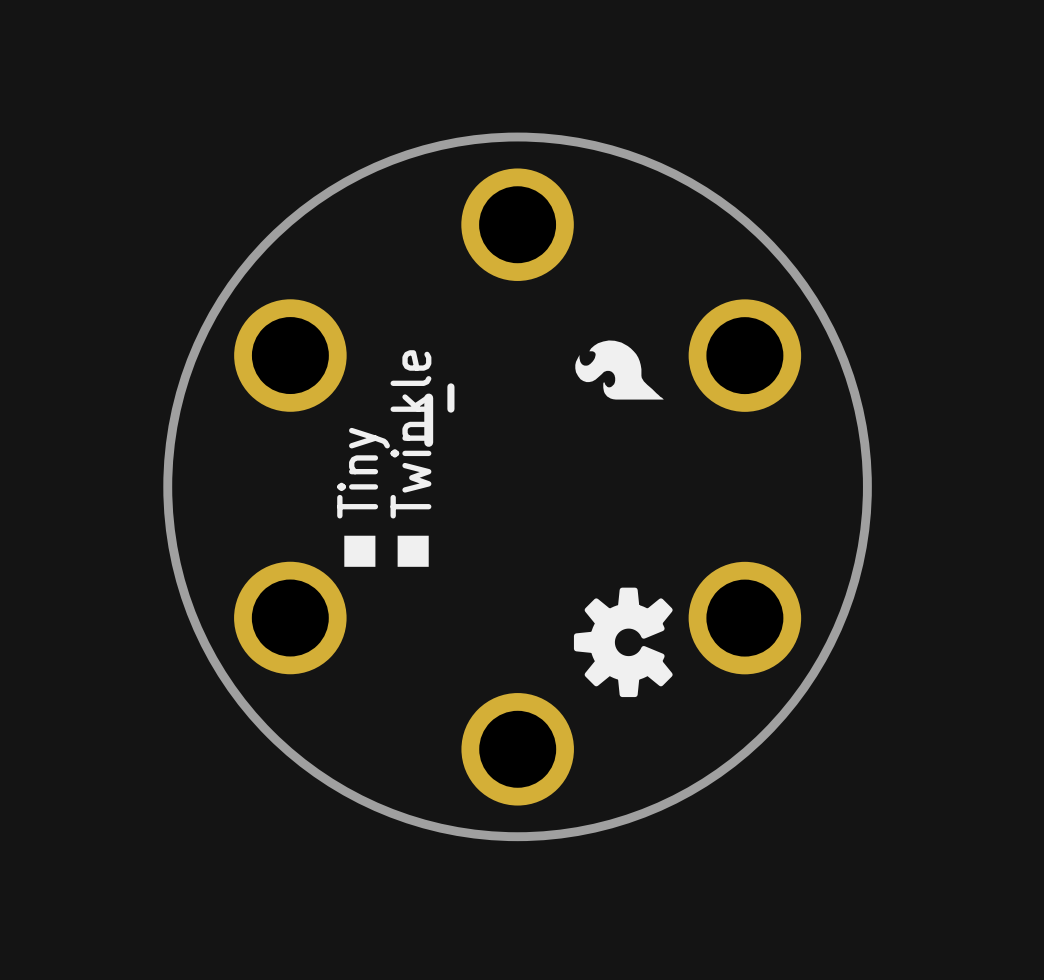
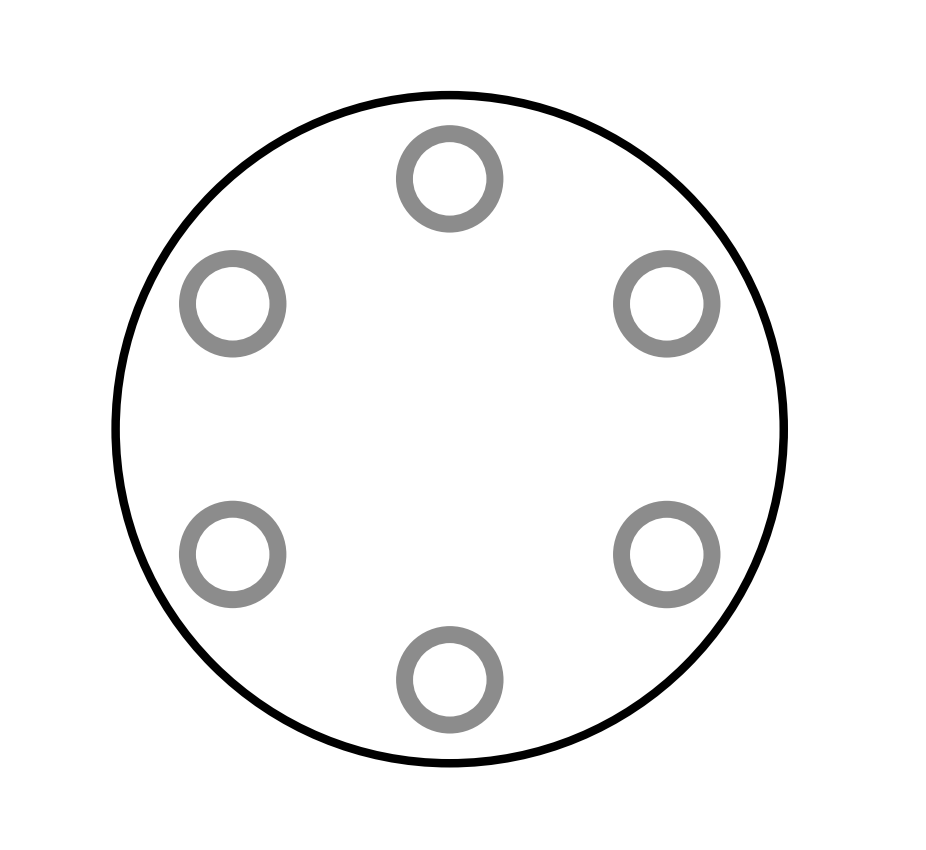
drawing: [575, 340, 665, 400] -> none
line: (450, 386) (450, 409) -> none
line: (428, 397) (428, 442) -> none
text: Twinkle (410, 434) -> none
text: Tiny (363, 473) -> none
drawing: [344, 535, 429, 567] -> none
drawing: [573, 587, 673, 698] -> none

